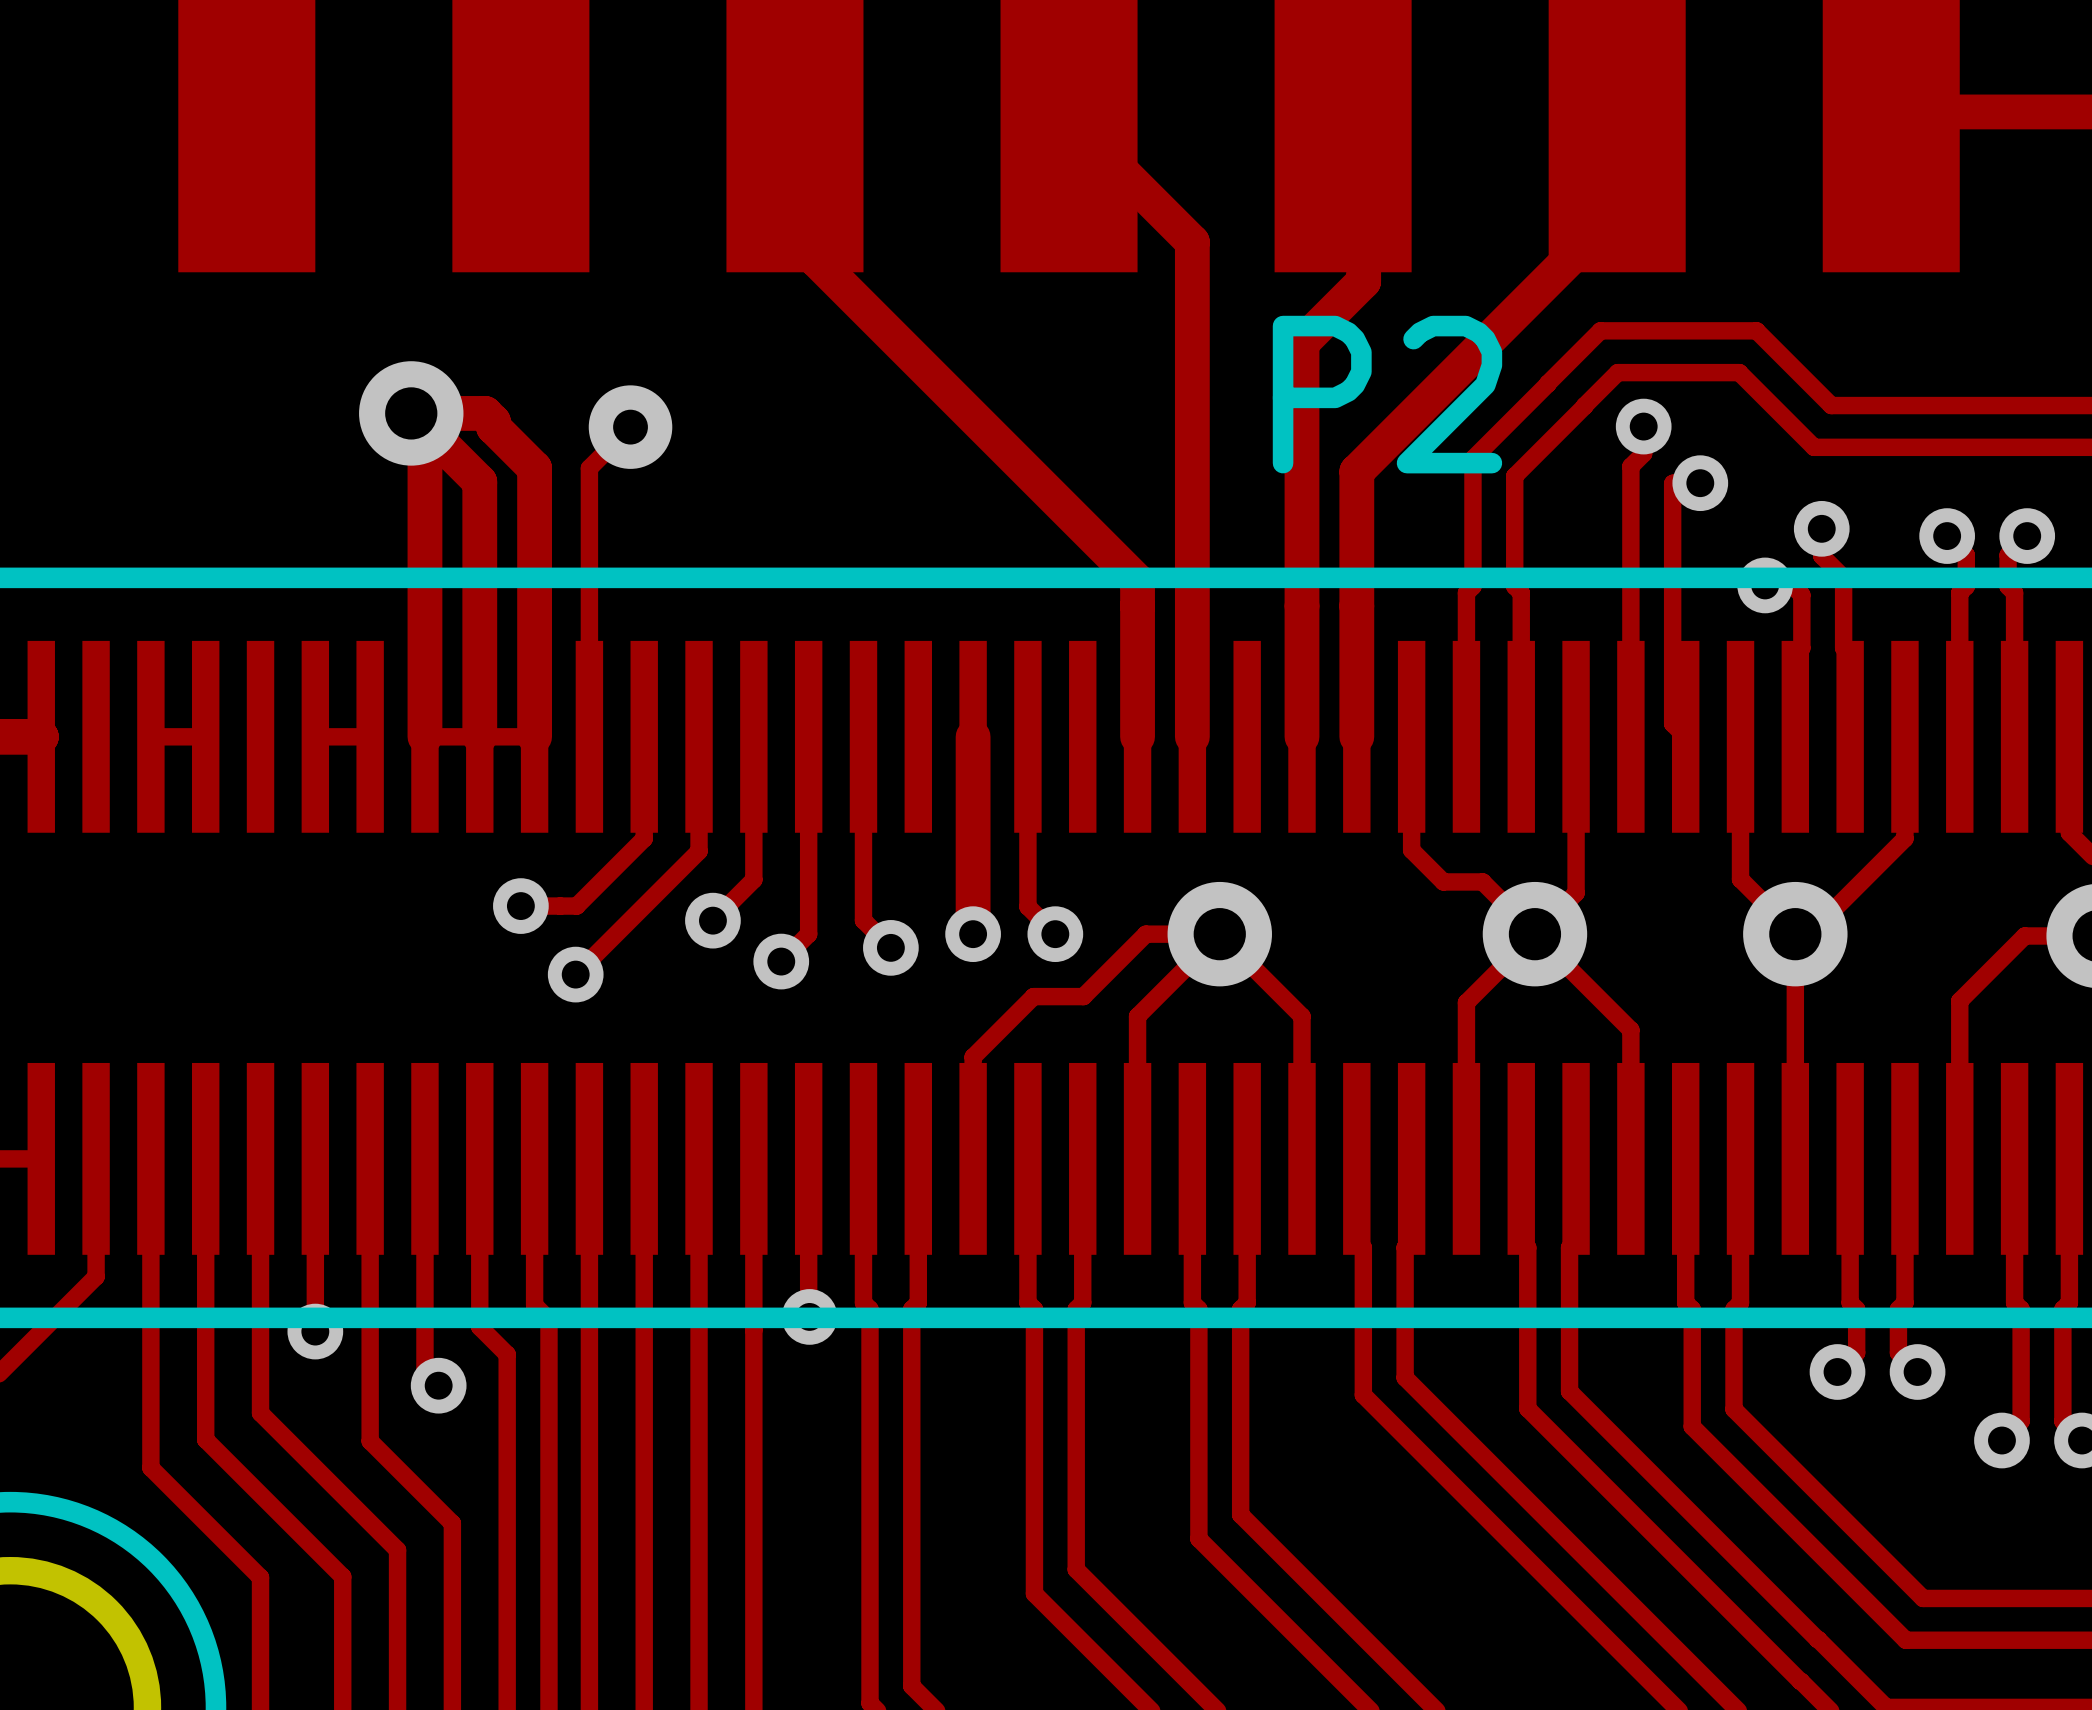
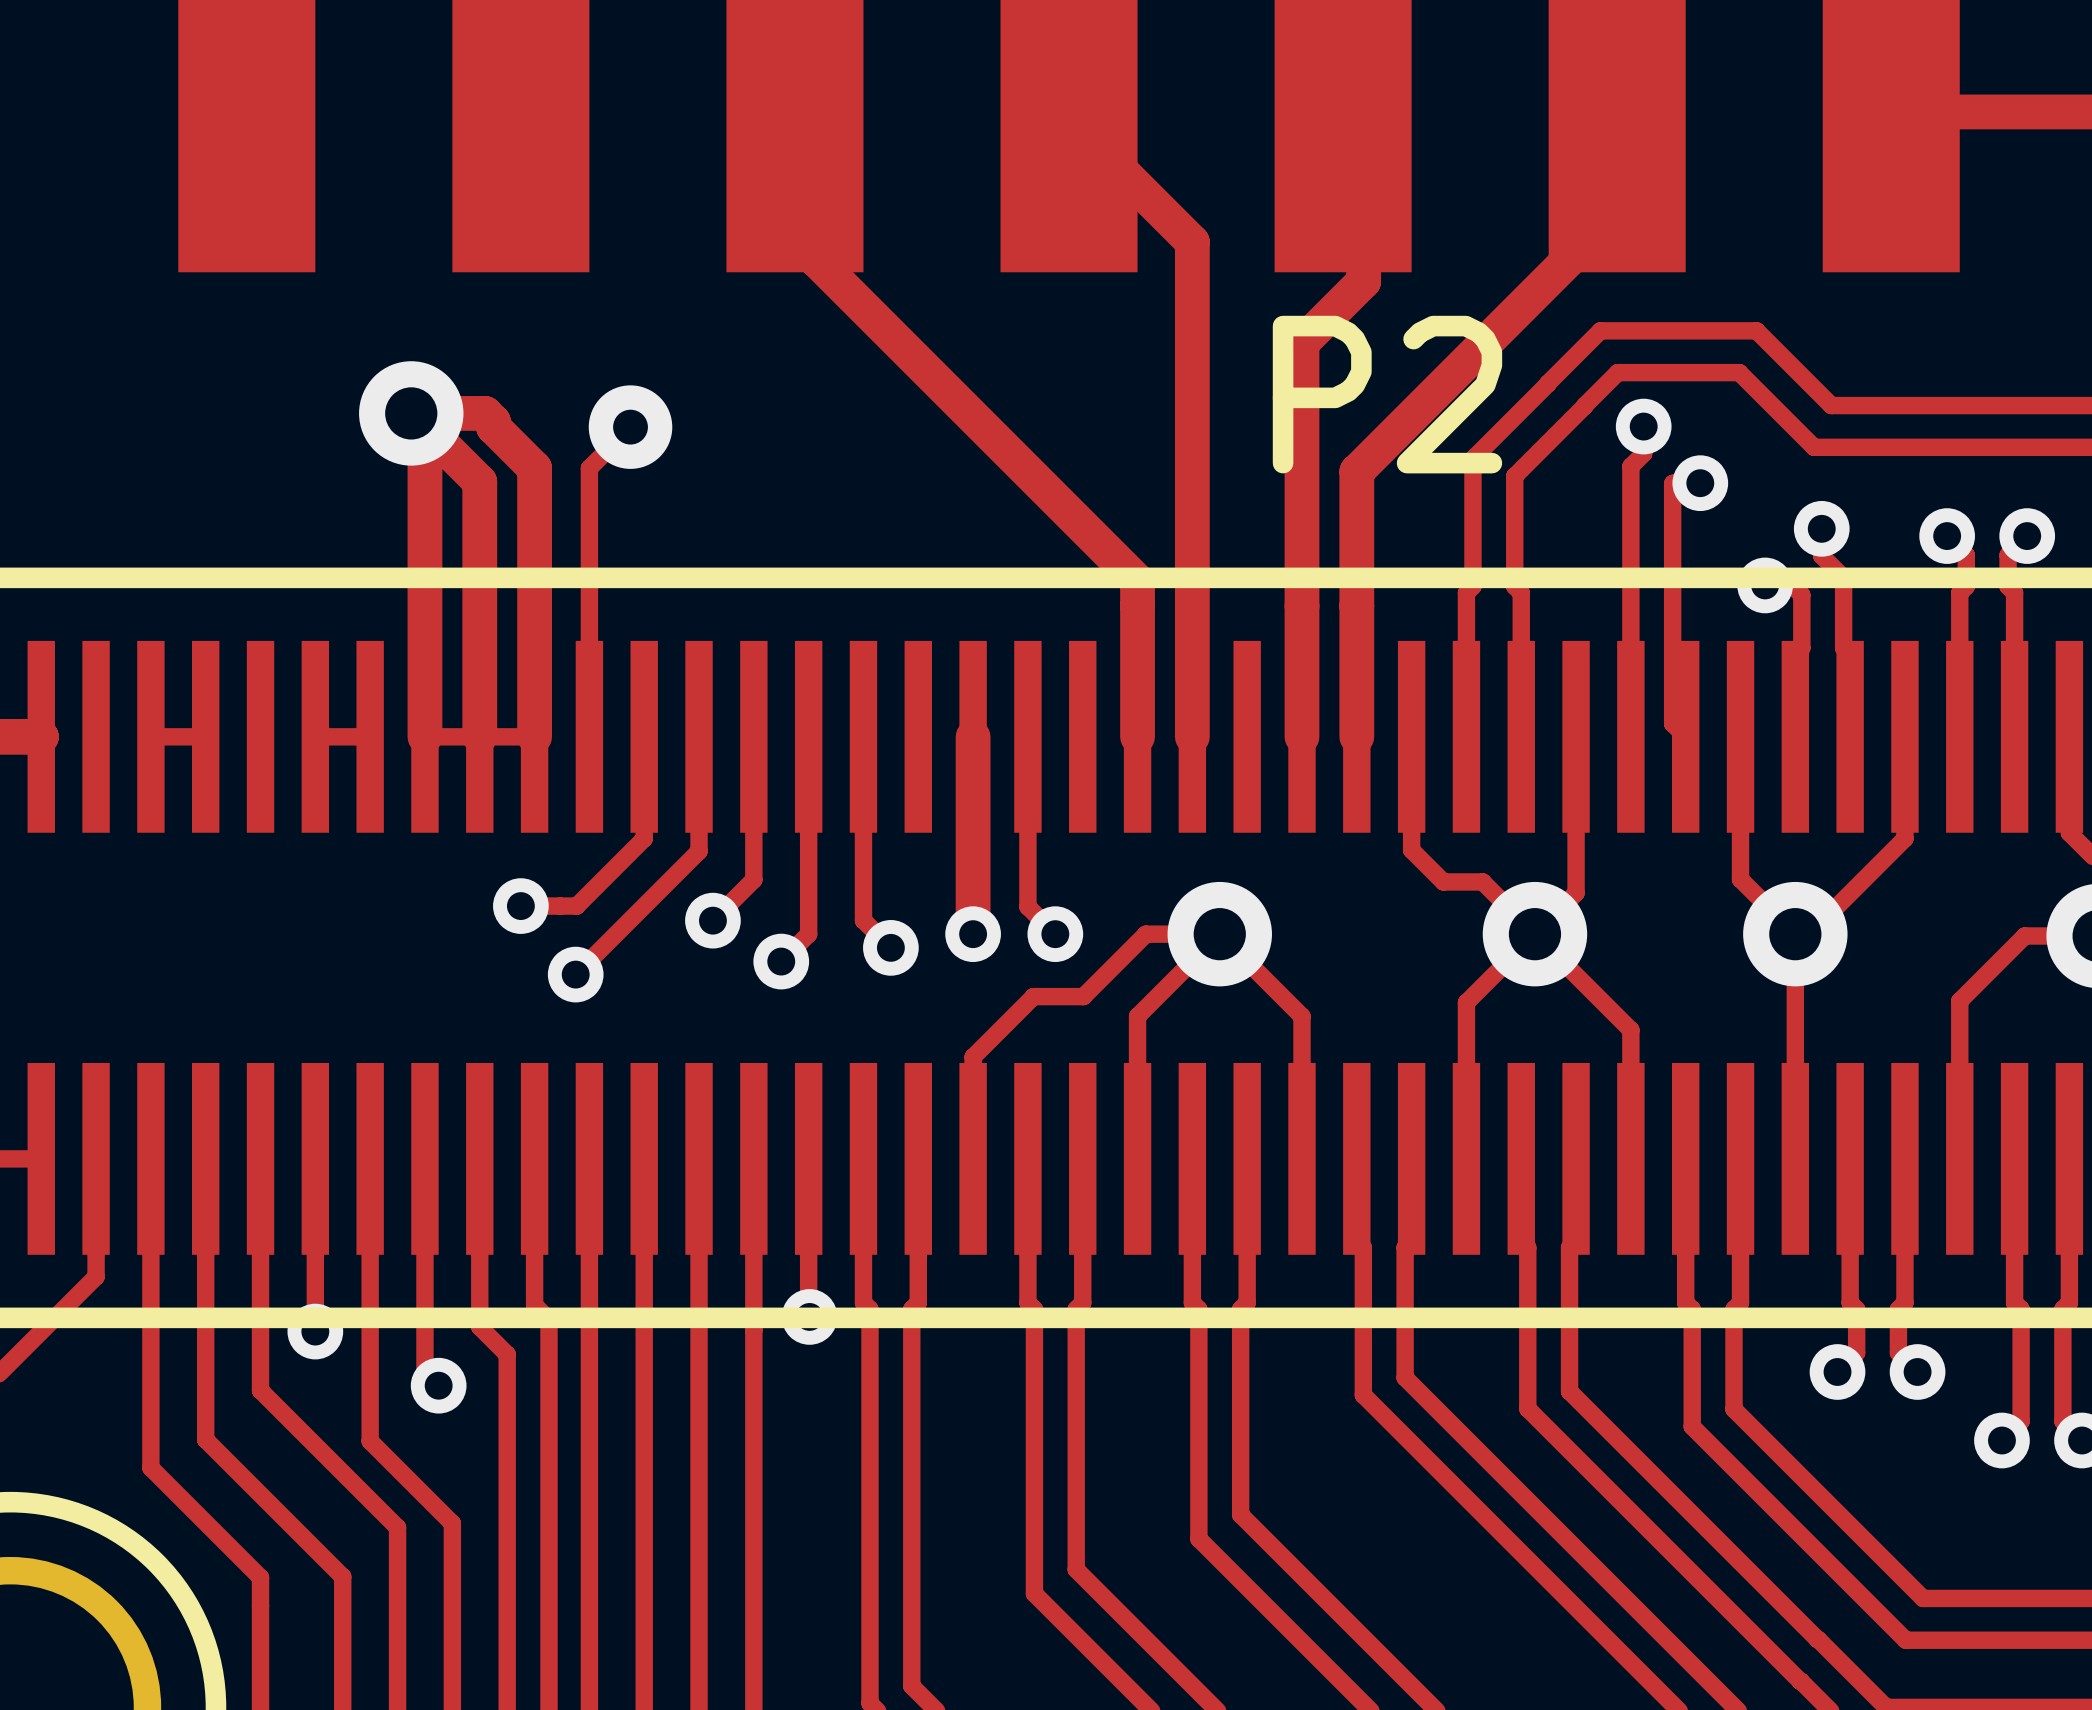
track: (260, 1390) (260, 1413) (397, 1550) -> (260, 1390) (397, 1527) (397, 1550)

